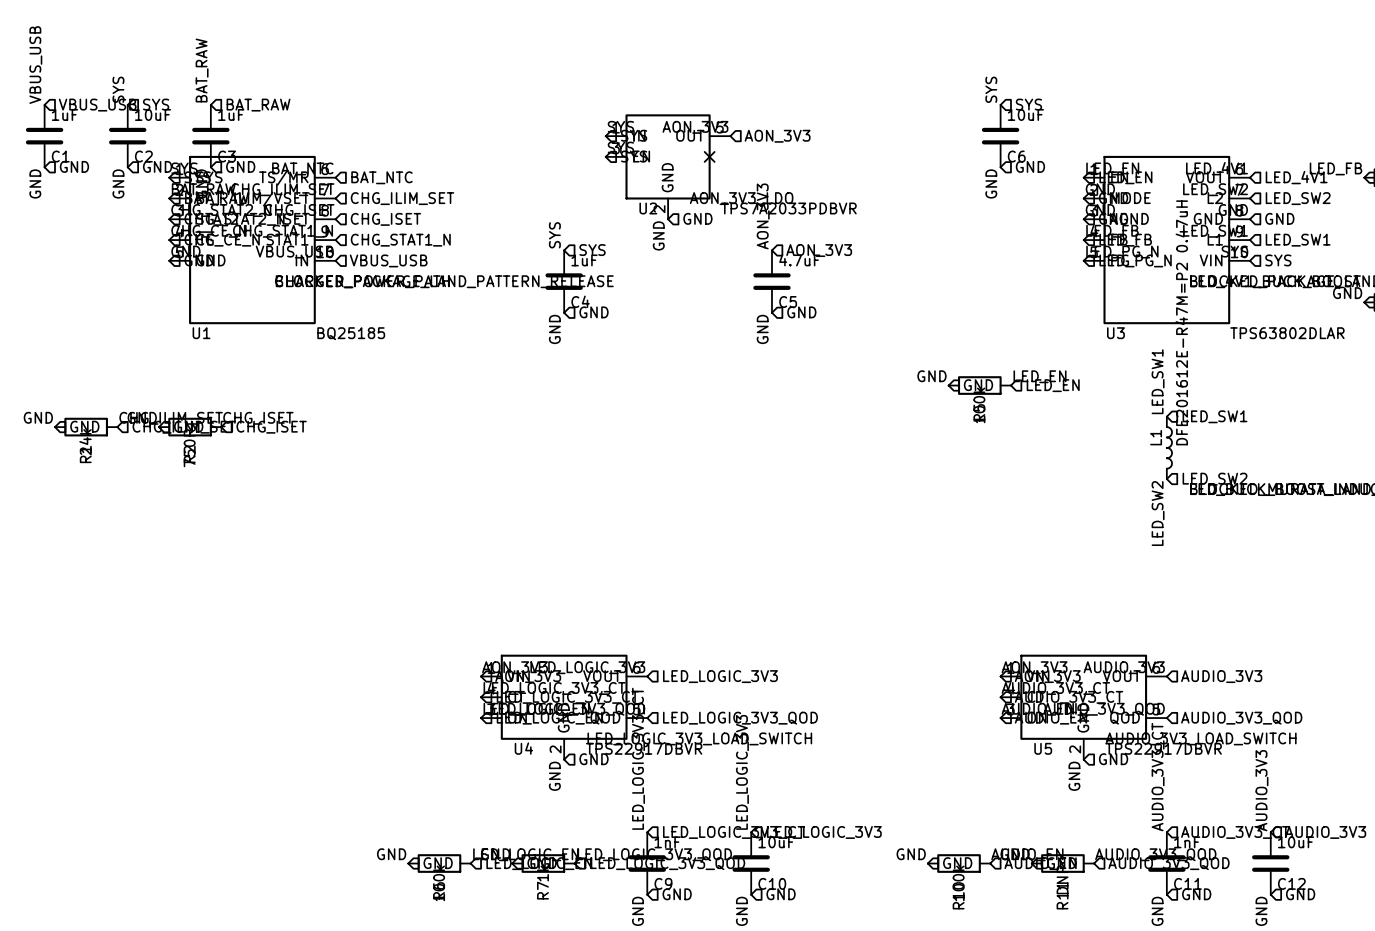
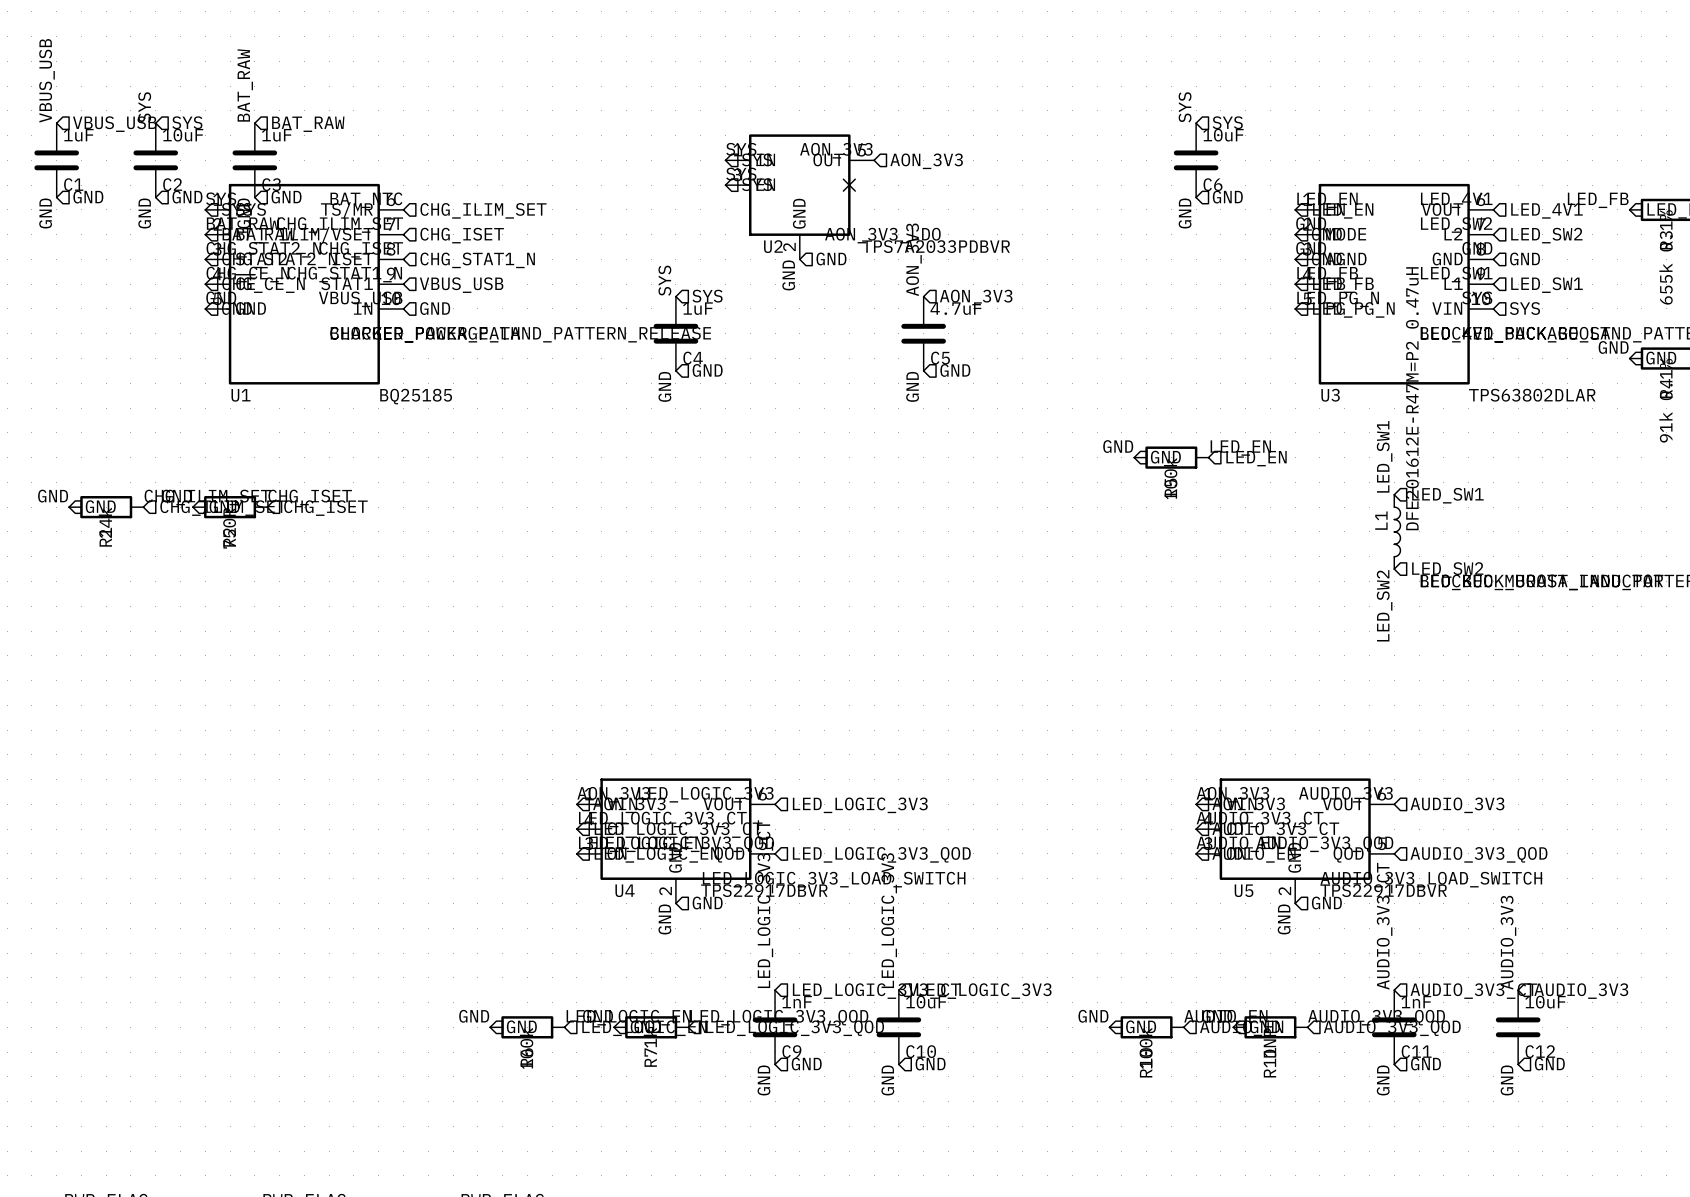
hierarchical label: BAT_NTC (381, 177) -> CHG_ILIM_SET (483, 210)
hierarchical label: CHG_ILIM_SET (402, 198) -> CHG_ISET (462, 235)
hierarchical label: CHG_ISET (385, 219) -> CHG_STAT1_N (477, 260)
hierarchical label: CHG_STAT1_N (400, 240) -> VBUS_USB (461, 285)
hierarchical label: VBUS_USB (388, 260) -> GND (435, 308)

